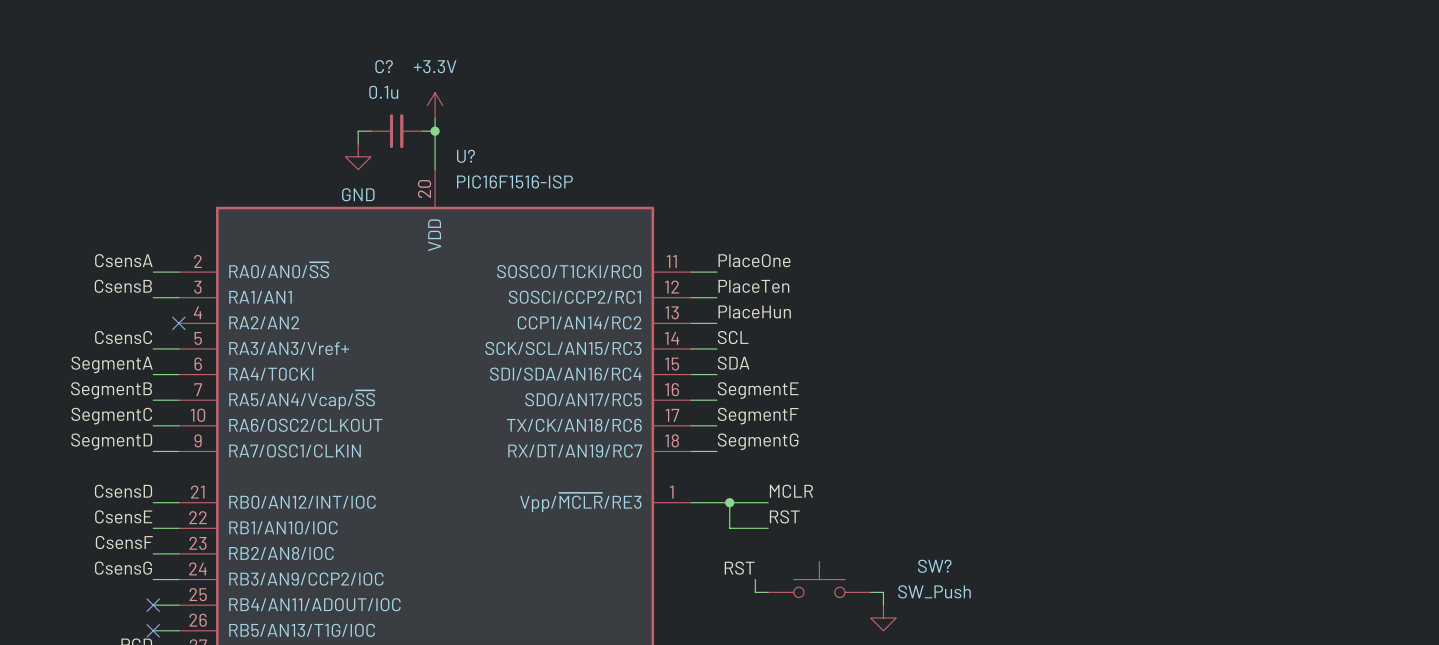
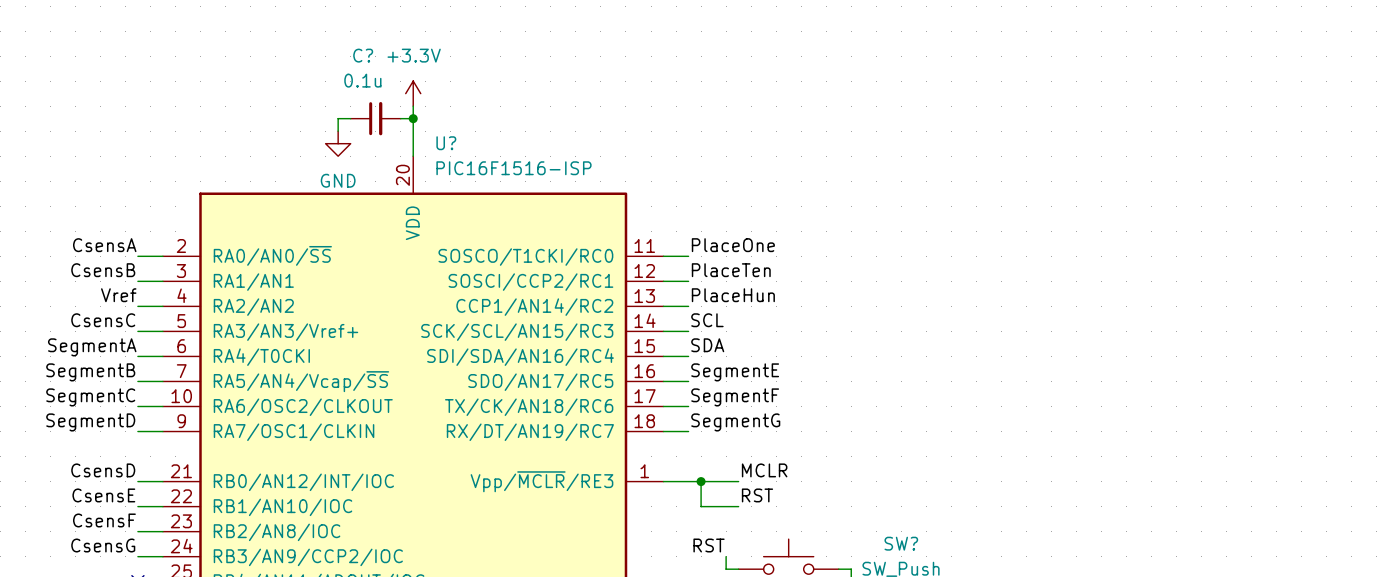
label: none -> Vref (118, 295)
wire: none -> (137, 306) (162, 306)
no-connect mark: (178, 323) -> none

